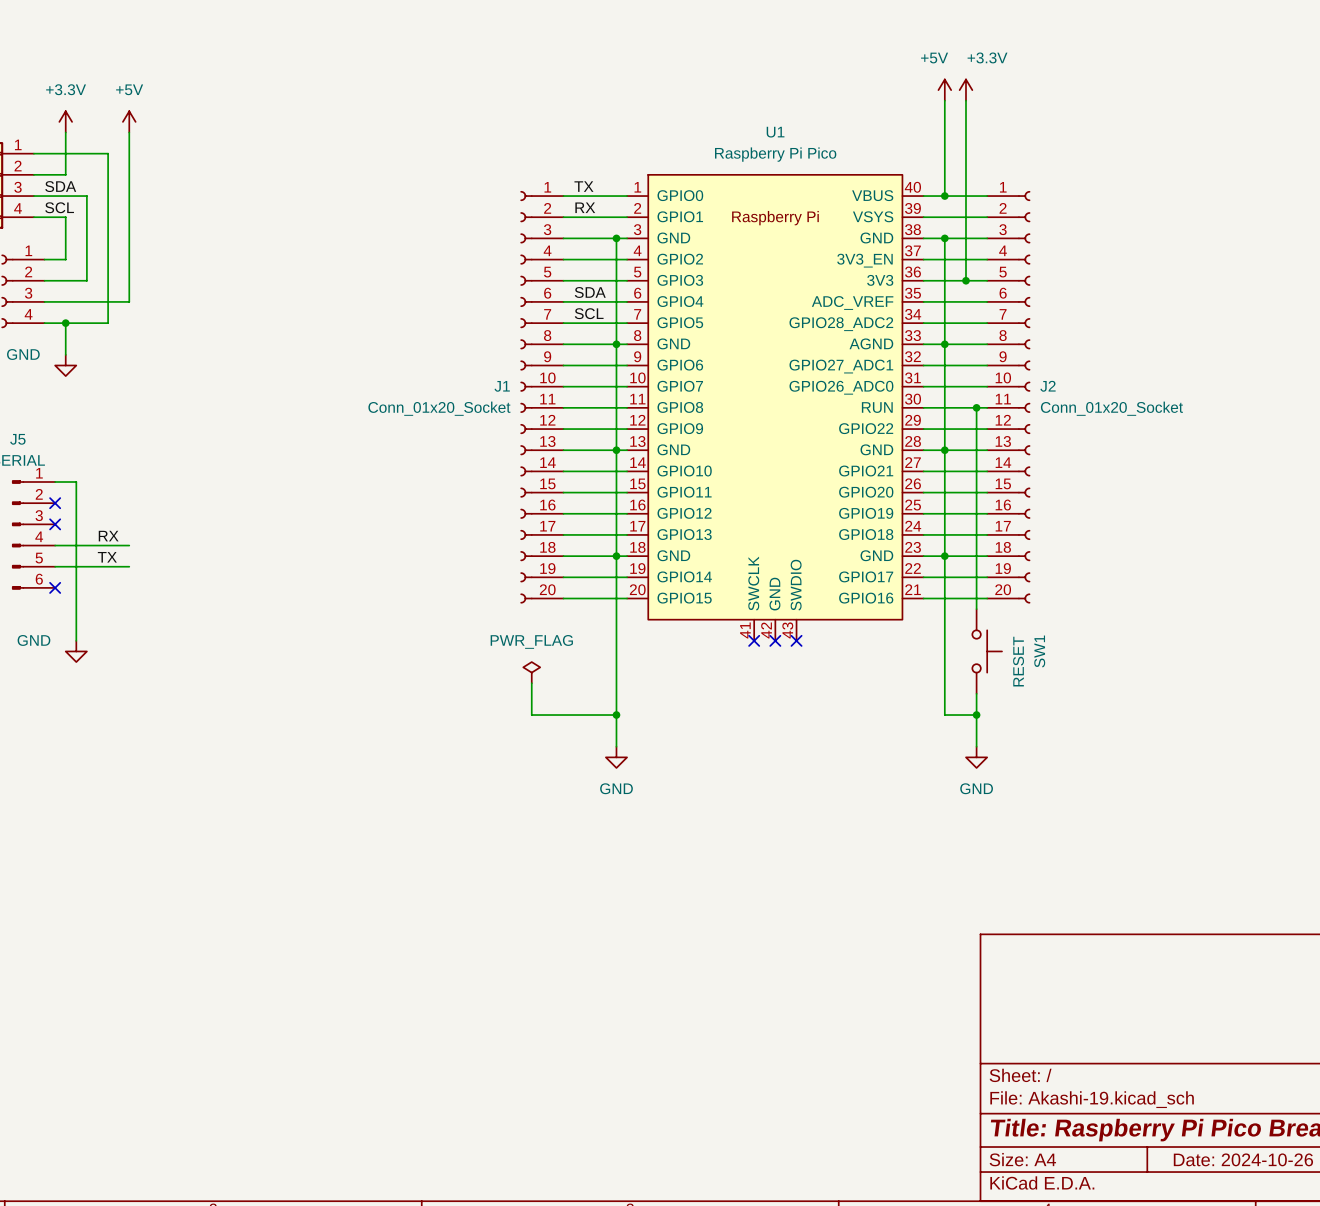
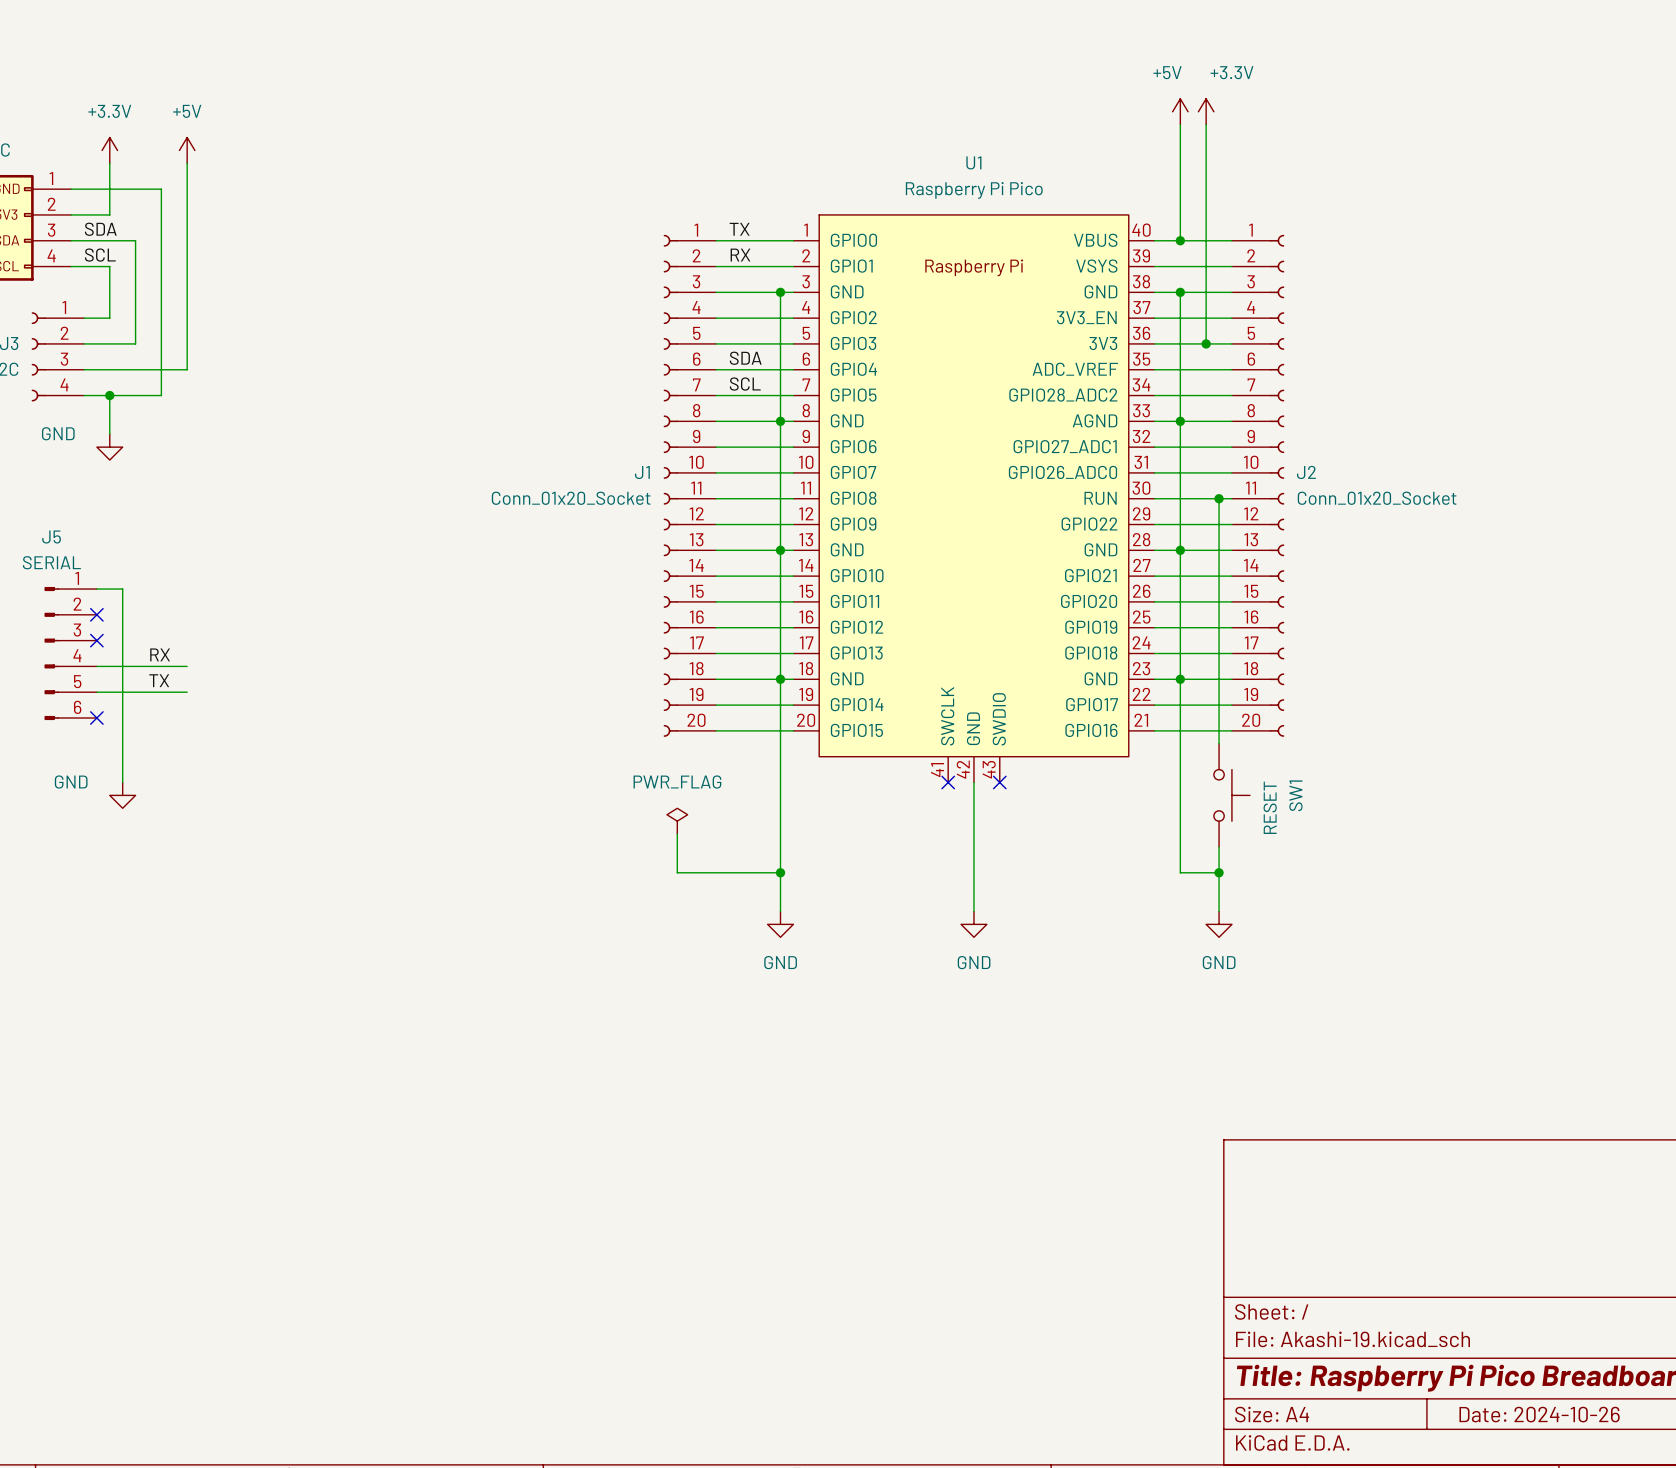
wire: none -> (973, 782) (973, 911)
no-connect mark: (775, 640) -> none
power symbol: none -> GND (973, 924)

